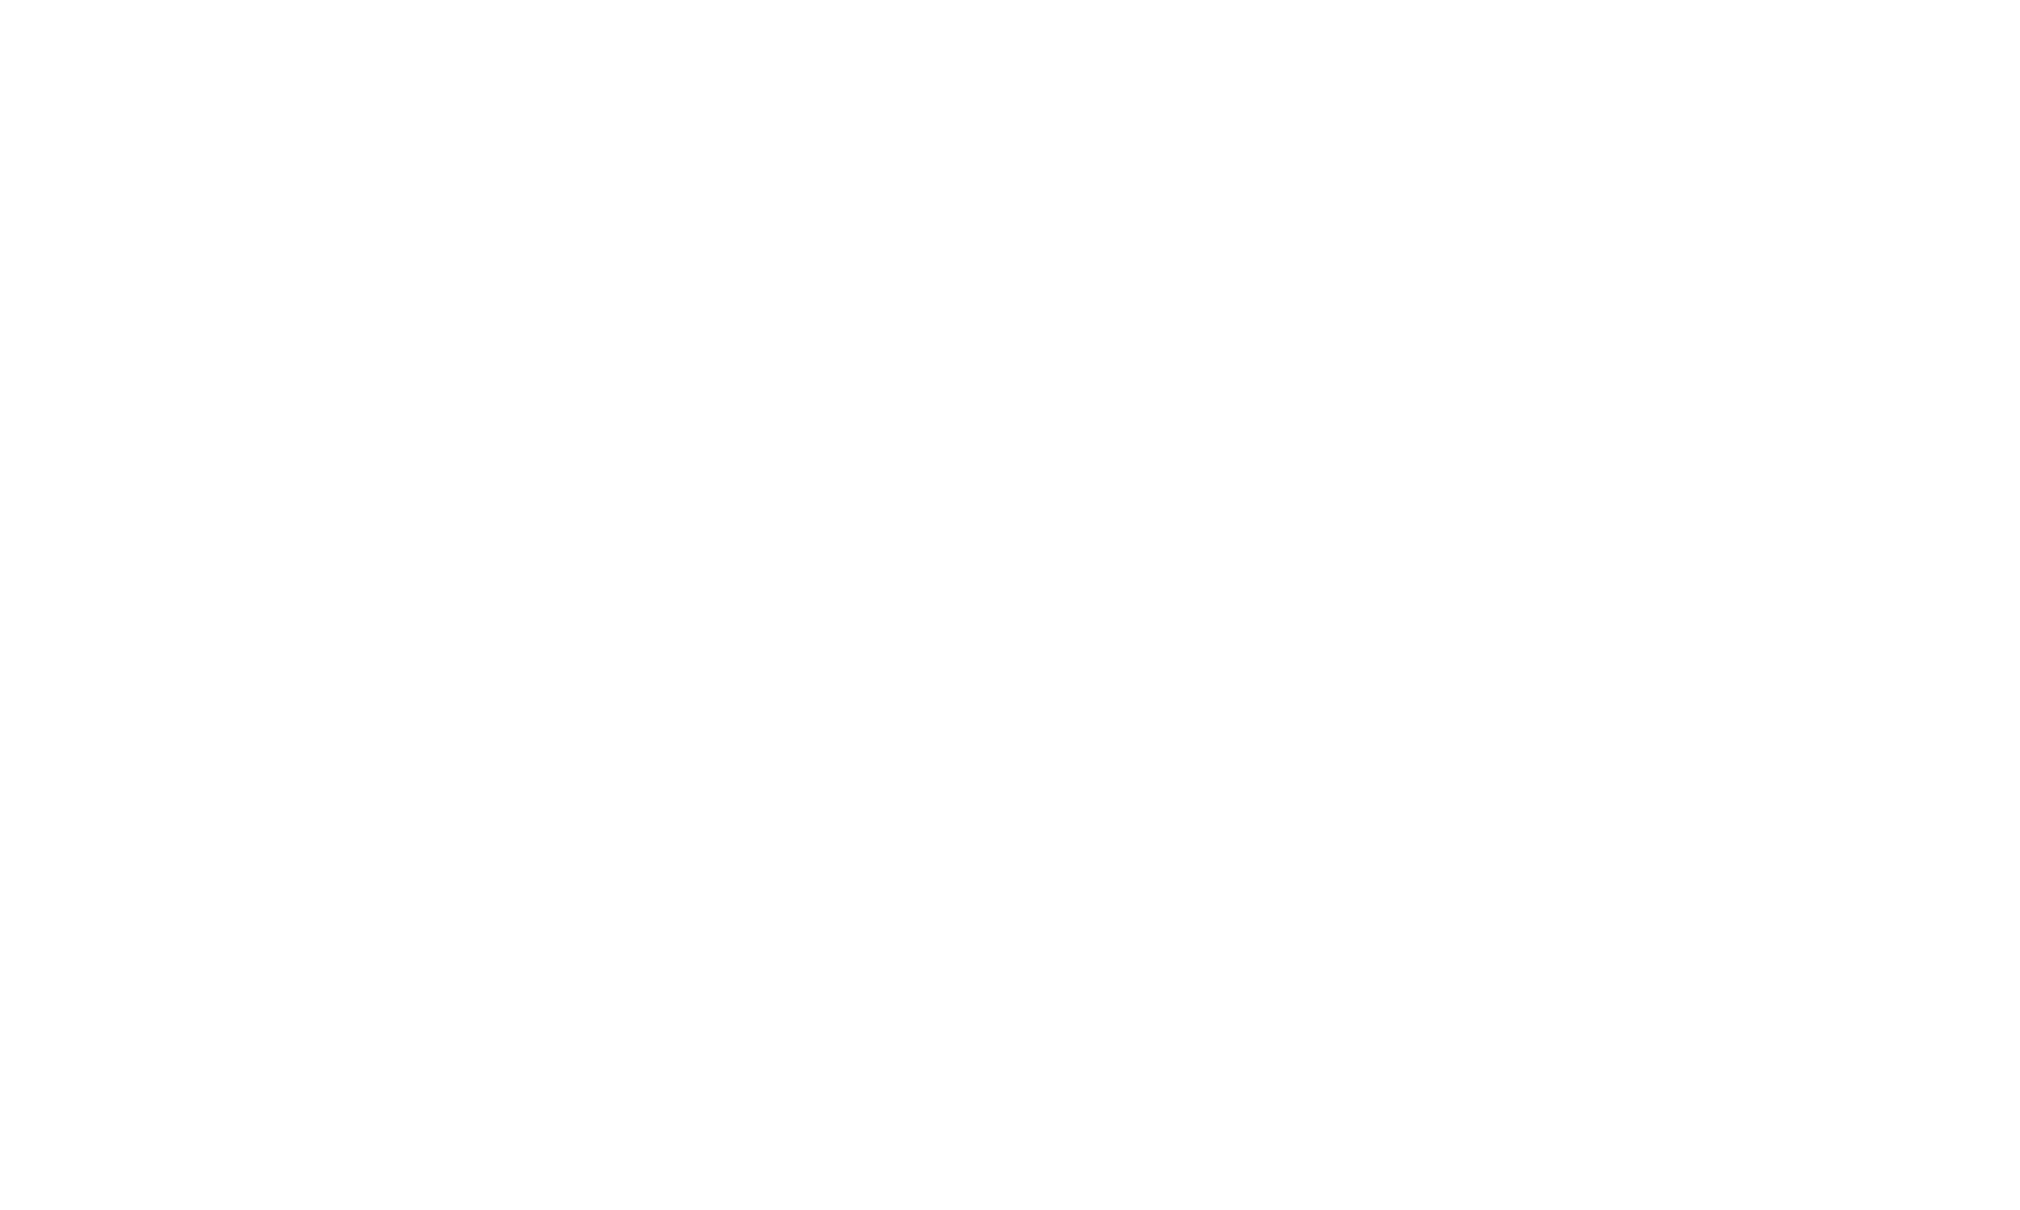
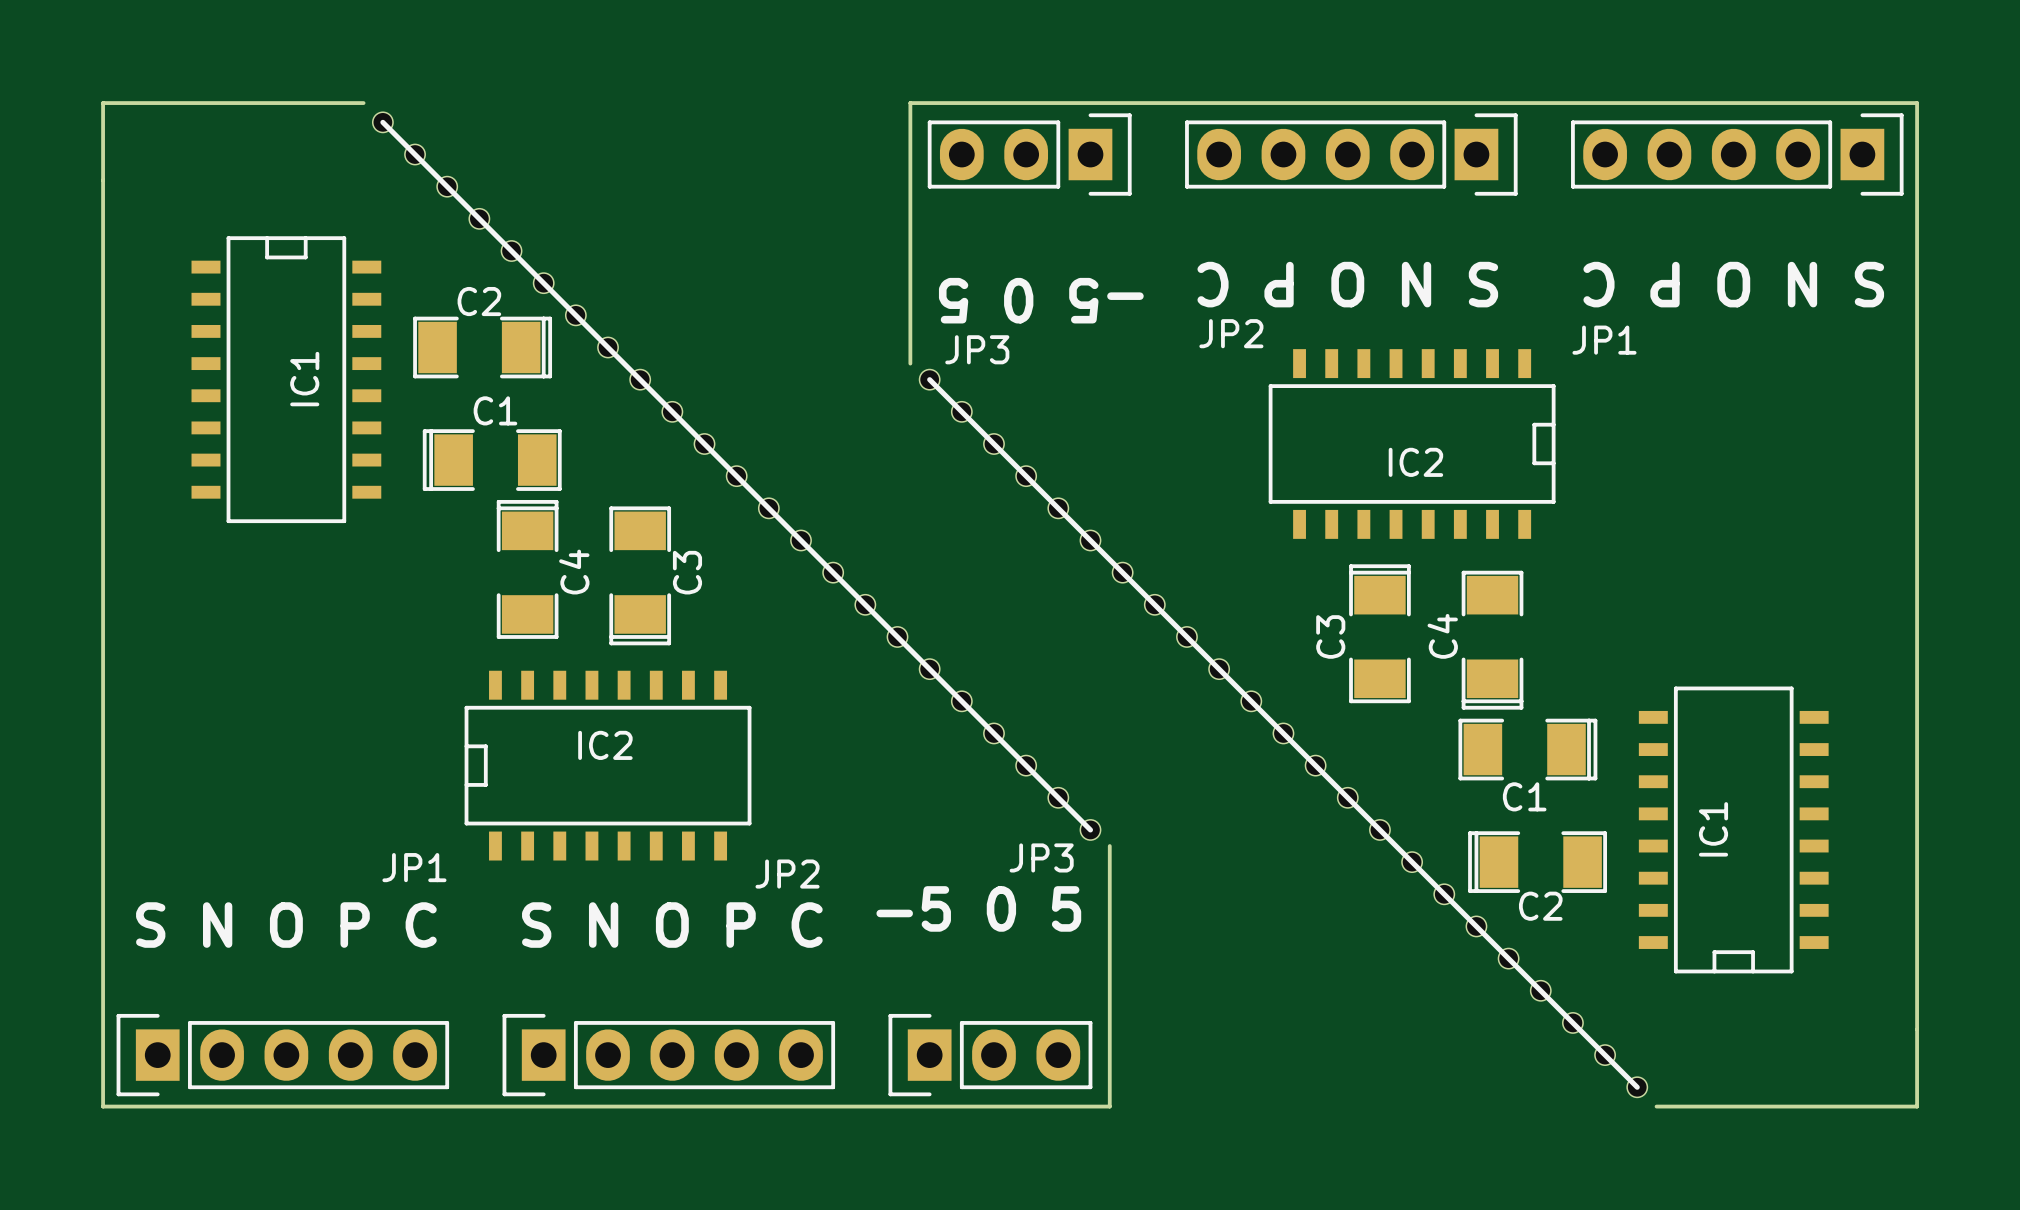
board edge: none -> (363, 103) (103, 103) (103, 1106) (1109, 1106) (1109, 846)
line: none -> (382, 122) (1090, 829)
part: none -> (382, 122)
part: none -> (415, 154)
JP3: none -> (1029, 154)
JP2: none -> (1351, 154)
JP1: none -> (1737, 154)
part: none -> (447, 186)
part: none -> (479, 218)
part: none -> (511, 251)
part: none -> (543, 283)
text: none -> S N O P C (1347, 284)
text: none -> S N O P C (1733, 284)
text: none -> -5 0 5 (1041, 300)
part: none -> (575, 315)
C2: none -> (482, 347)
part: none -> (608, 347)
board edge: none -> (910, 363) (910, 103) (1917, 103) (1917, 1106) (1656, 1106)
IC1: none -> (286, 379)
part: none -> (640, 379)
line: none -> (929, 379) (1637, 1087)
part: none -> (929, 379)
part: none -> (672, 411)
part: none -> (961, 411)
part: none -> (704, 443)
part: none -> (993, 443)
IC2: none -> (1412, 443)
C1: none -> (492, 460)
part: none -> (736, 476)
part: none -> (1026, 476)
part: none -> (768, 508)
part: none -> (1058, 508)
part: none -> (801, 540)
part: none -> (1090, 540)
C4: none -> (527, 569)
part: none -> (833, 572)
part: none -> (1122, 572)
C3: none -> (640, 575)
part: none -> (865, 604)
part: none -> (1154, 604)
C3: none -> (1379, 633)
part: none -> (897, 636)
part: none -> (1186, 636)
C4: none -> (1492, 640)
part: none -> (929, 669)
part: none -> (1219, 669)
part: none -> (961, 701)
part: none -> (1251, 701)
part: none -> (993, 733)
part: none -> (1283, 733)
C1: none -> (1527, 749)
IC2: none -> (608, 765)
part: none -> (1026, 765)
part: none -> (1315, 765)
part: none -> (1058, 797)
part: none -> (1347, 797)
part: none -> (1090, 829)
part: none -> (1379, 829)
IC1: none -> (1733, 829)
part: none -> (1412, 862)
C2: none -> (1537, 862)
part: none -> (1444, 894)
text: none -> -5 0 5 (978, 908)
text: none -> S N O P C (286, 925)
text: none -> S N O P C (672, 925)
part: none -> (1476, 926)
part: none -> (1508, 958)
part: none -> (1540, 990)
part: none -> (1572, 1022)
JP1: none -> (282, 1055)
JP2: none -> (668, 1055)
JP3: none -> (990, 1055)
part: none -> (1605, 1055)
part: none -> (1637, 1087)

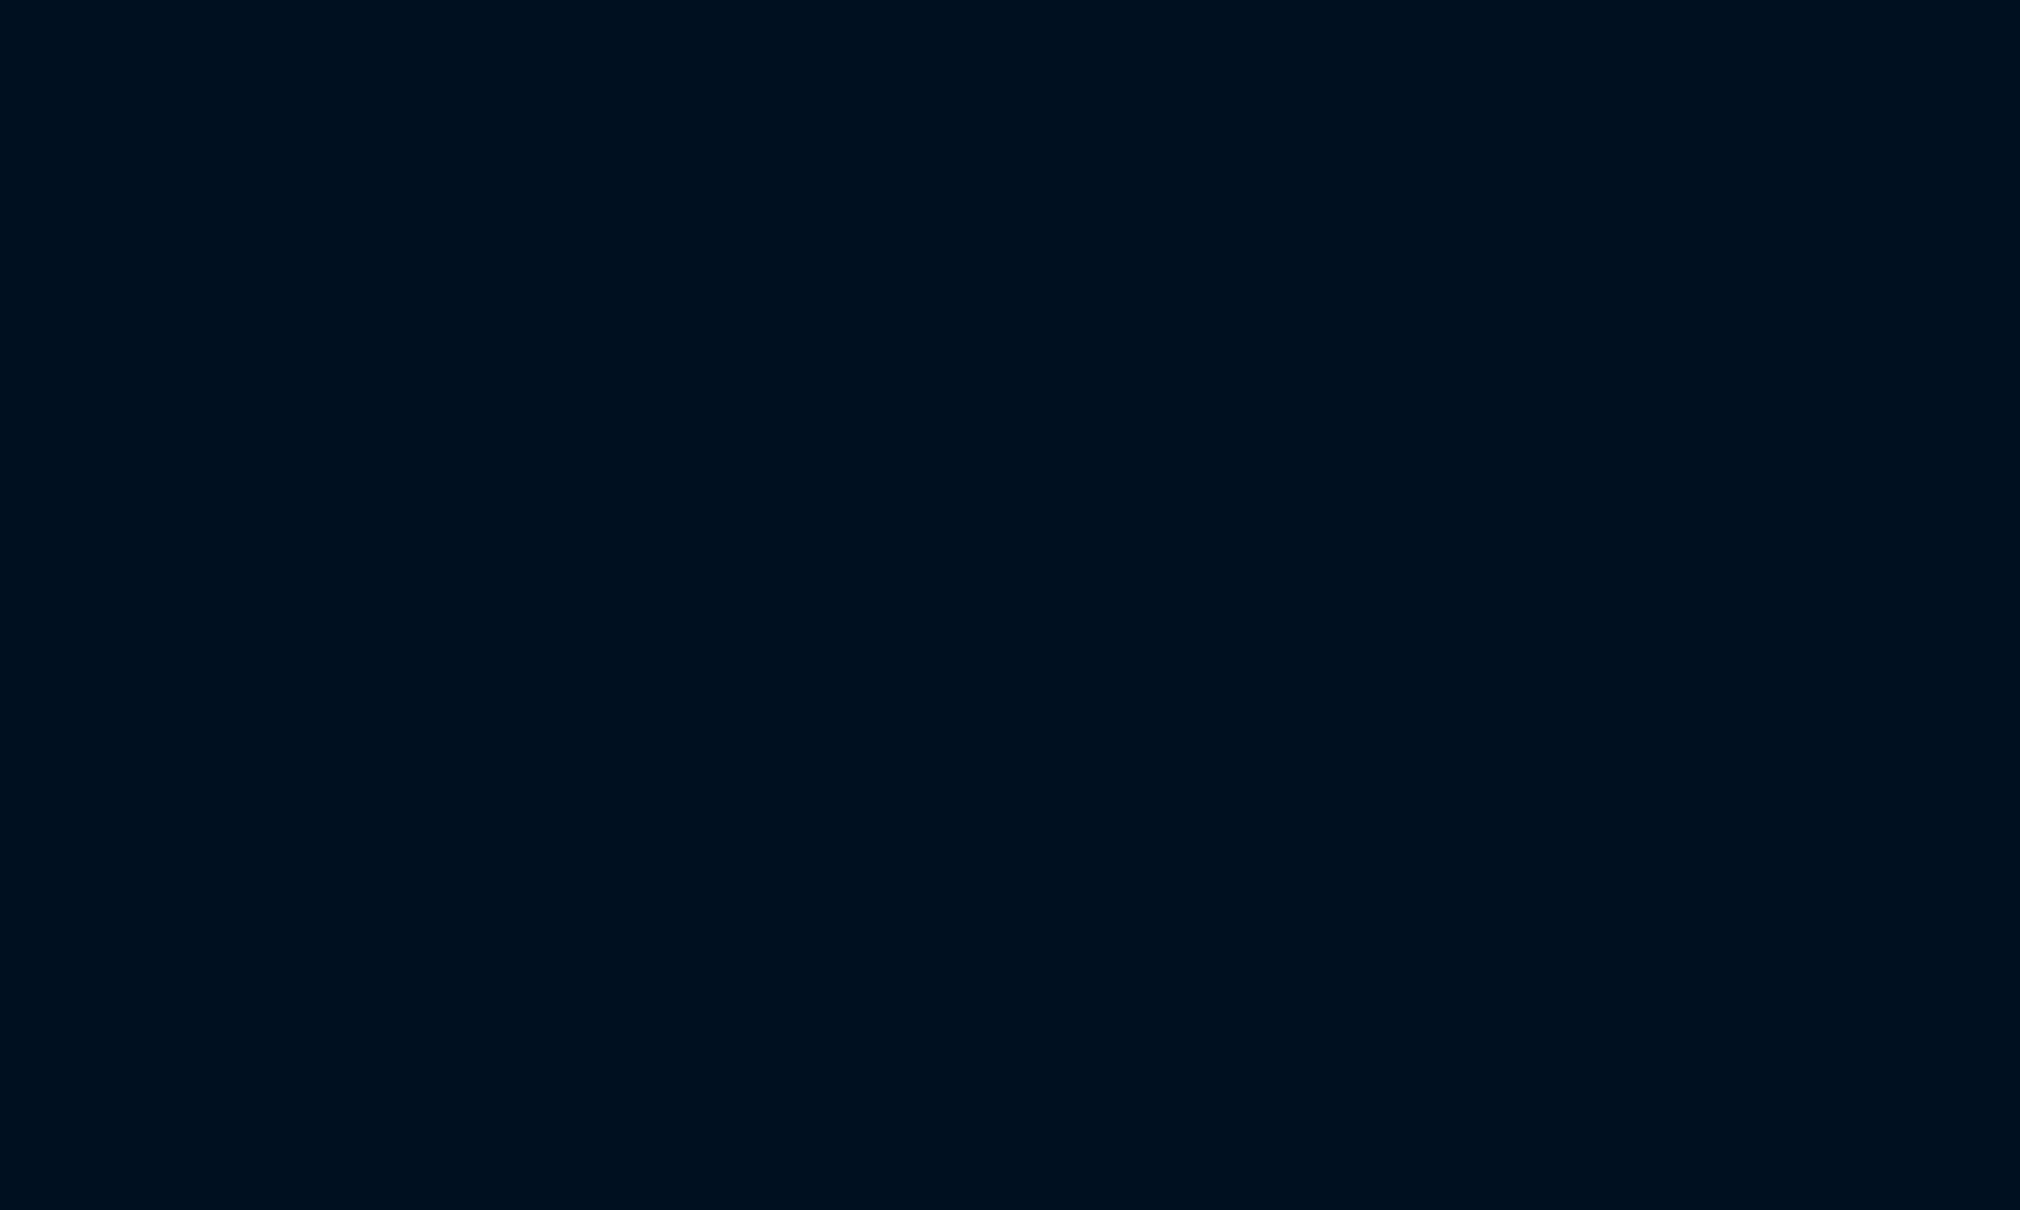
board edge: (363, 103) (103, 103) (103, 1106) (1109, 1106) (1109, 846) -> none
line: (382, 122) (1090, 829) -> none
part: (382, 122) -> none
part: (415, 154) -> none
JP3: (1029, 154) -> none
JP2: (1351, 154) -> none
JP1: (1737, 154) -> none
part: (447, 186) -> none
part: (479, 218) -> none
part: (511, 251) -> none
part: (543, 283) -> none
text: S N O P C (1347, 284) -> none
text: S N O P C (1733, 284) -> none
text: -5 0 5 (1041, 300) -> none
part: (575, 315) -> none
C2: (482, 347) -> none
part: (608, 347) -> none
board edge: (910, 363) (910, 103) (1917, 103) (1917, 1106) (1656, 1106) -> none
IC1: (286, 379) -> none
part: (640, 379) -> none
line: (929, 379) (1637, 1087) -> none
part: (929, 379) -> none
part: (672, 411) -> none
part: (961, 411) -> none
part: (704, 443) -> none
part: (993, 443) -> none
IC2: (1412, 443) -> none
C1: (492, 460) -> none
part: (736, 476) -> none
part: (1026, 476) -> none
part: (768, 508) -> none
part: (1058, 508) -> none
part: (801, 540) -> none
part: (1090, 540) -> none
C4: (527, 569) -> none
part: (833, 572) -> none
part: (1122, 572) -> none
C3: (640, 575) -> none
part: (865, 604) -> none
part: (1154, 604) -> none
C3: (1379, 633) -> none
part: (897, 636) -> none
part: (1186, 636) -> none
C4: (1492, 640) -> none
part: (929, 669) -> none
part: (1219, 669) -> none
part: (961, 701) -> none
part: (1251, 701) -> none
part: (993, 733) -> none
part: (1283, 733) -> none
C1: (1527, 749) -> none
IC2: (608, 765) -> none
part: (1026, 765) -> none
part: (1315, 765) -> none
part: (1058, 797) -> none
part: (1347, 797) -> none
part: (1090, 829) -> none
part: (1379, 829) -> none
IC1: (1733, 829) -> none
part: (1412, 862) -> none
C2: (1537, 862) -> none
part: (1444, 894) -> none
text: -5 0 5 (978, 908) -> none
text: S N O P C (286, 925) -> none
text: S N O P C (672, 925) -> none
part: (1476, 926) -> none
part: (1508, 958) -> none
part: (1540, 990) -> none
part: (1572, 1022) -> none
JP1: (282, 1055) -> none
JP2: (668, 1055) -> none
JP3: (990, 1055) -> none
part: (1605, 1055) -> none
part: (1637, 1087) -> none

